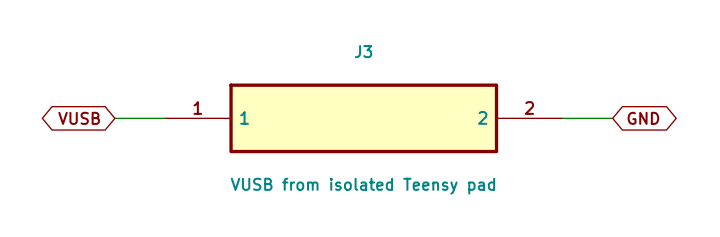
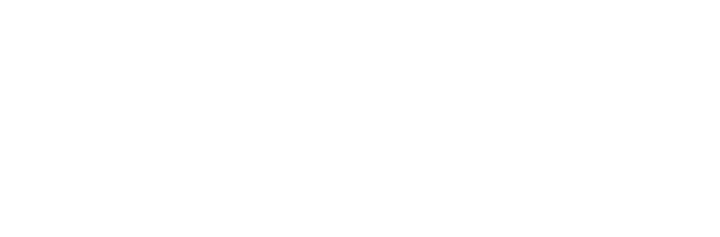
global label: VUSB (79, 118) -> none
wire: (114, 118) (164, 118) -> none
J3: VUSB from isolated Teensy pad (363, 118) -> none
wire: (562, 118) (612, 118) -> none
global label: GND (643, 118) -> none

